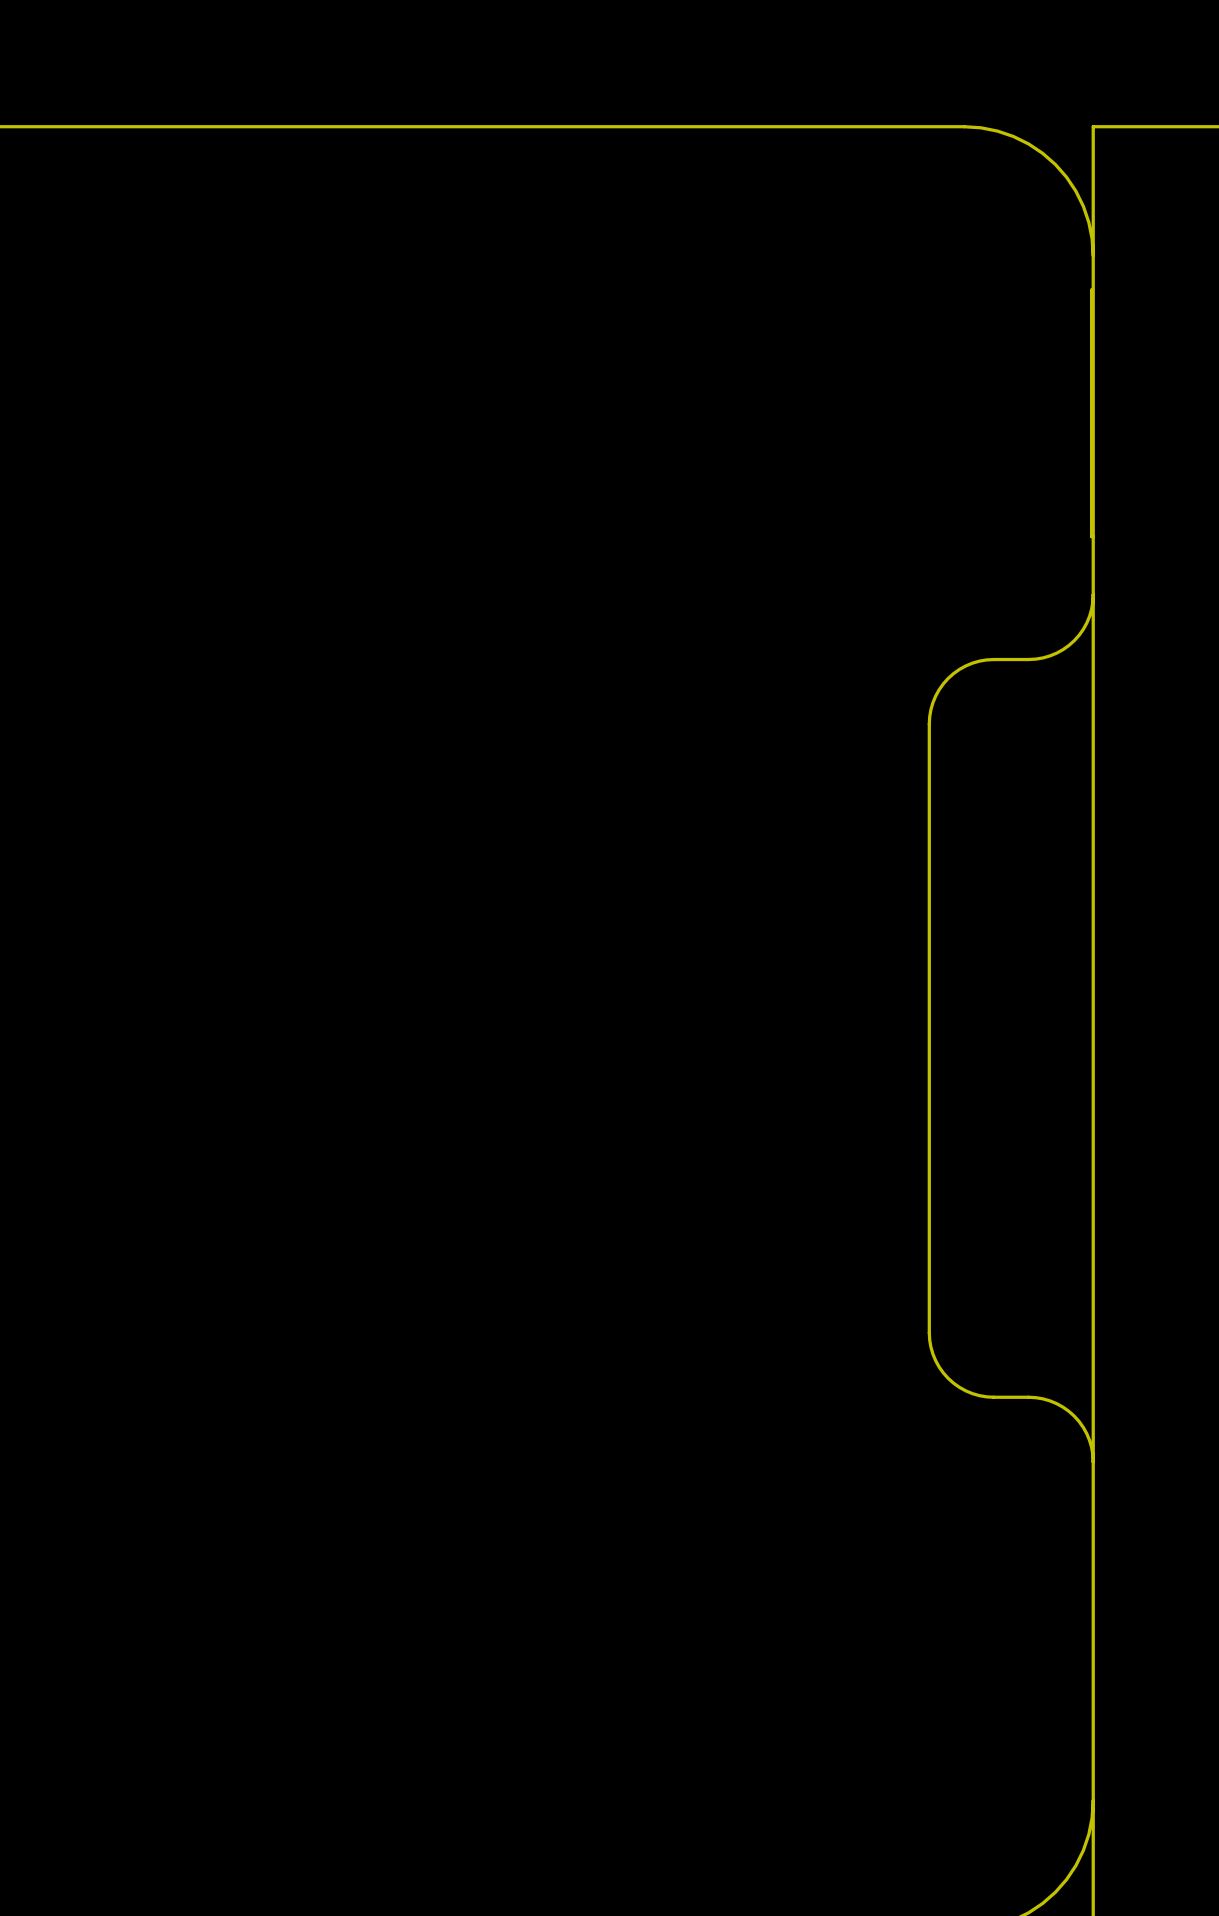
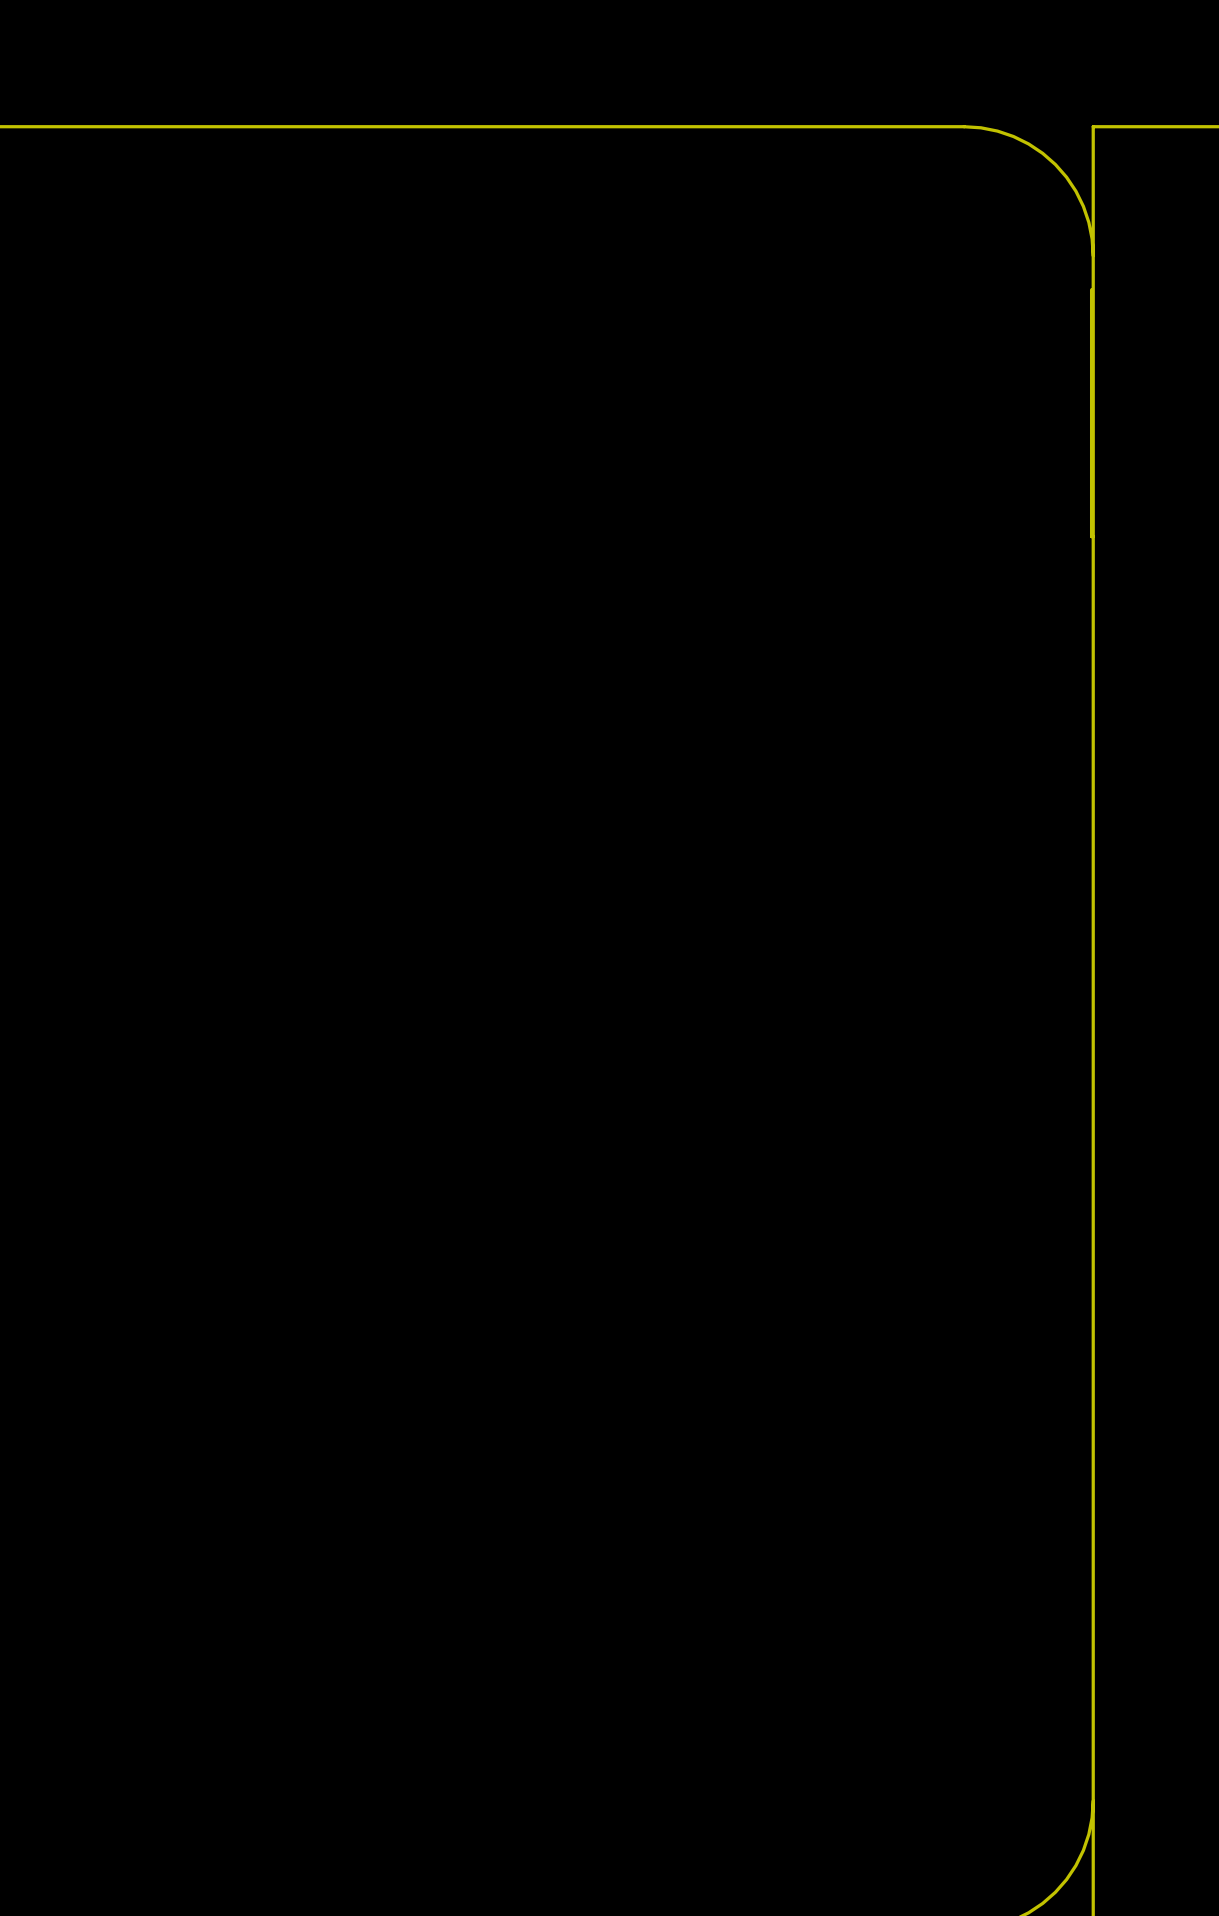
board edge: (1093, 594) (1091, 609) (1086, 622) (1074, 640) (1063, 649) (1050, 655) (1035, 659) (979, 661) (965, 665) (953, 673) (943, 683) (935, 696) (930, 709) (929, 724) (929, 1332) (930, 1347) (935, 1360) (943, 1372) (953, 1383) (965, 1390) (986, 1396) (1035, 1397) (1050, 1400) (1063, 1407) (1074, 1416) (1086, 1433) (1091, 1447) (1093, 1461) -> none

